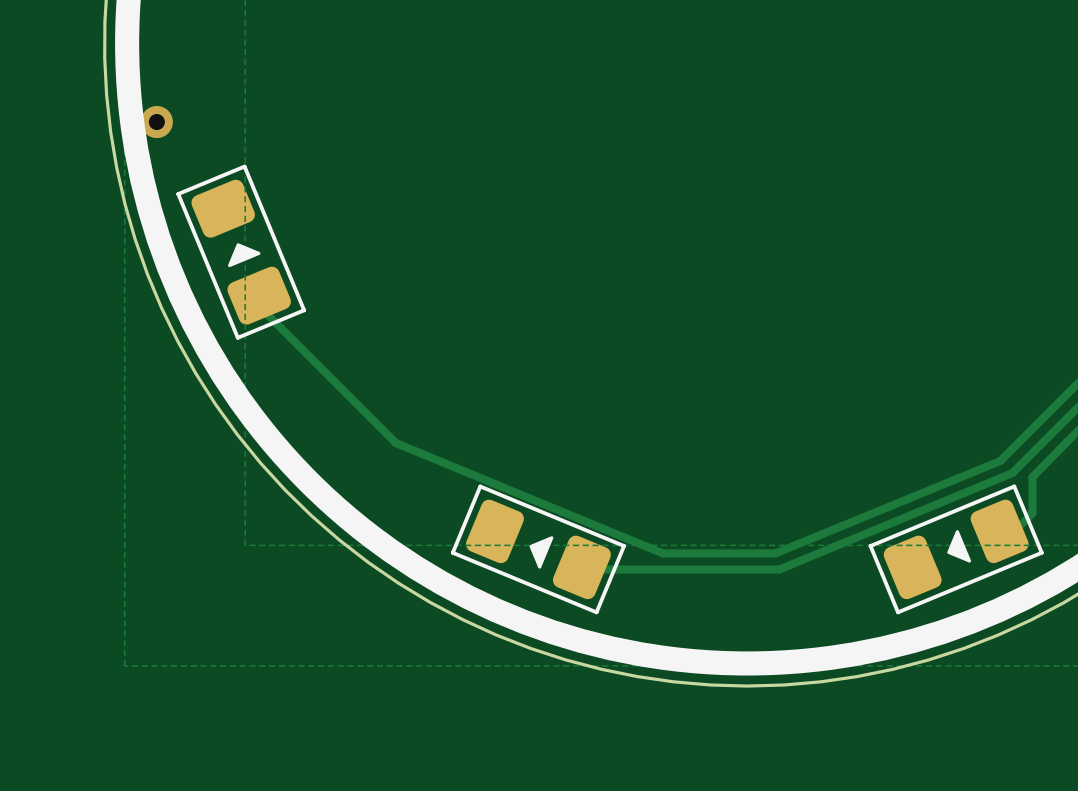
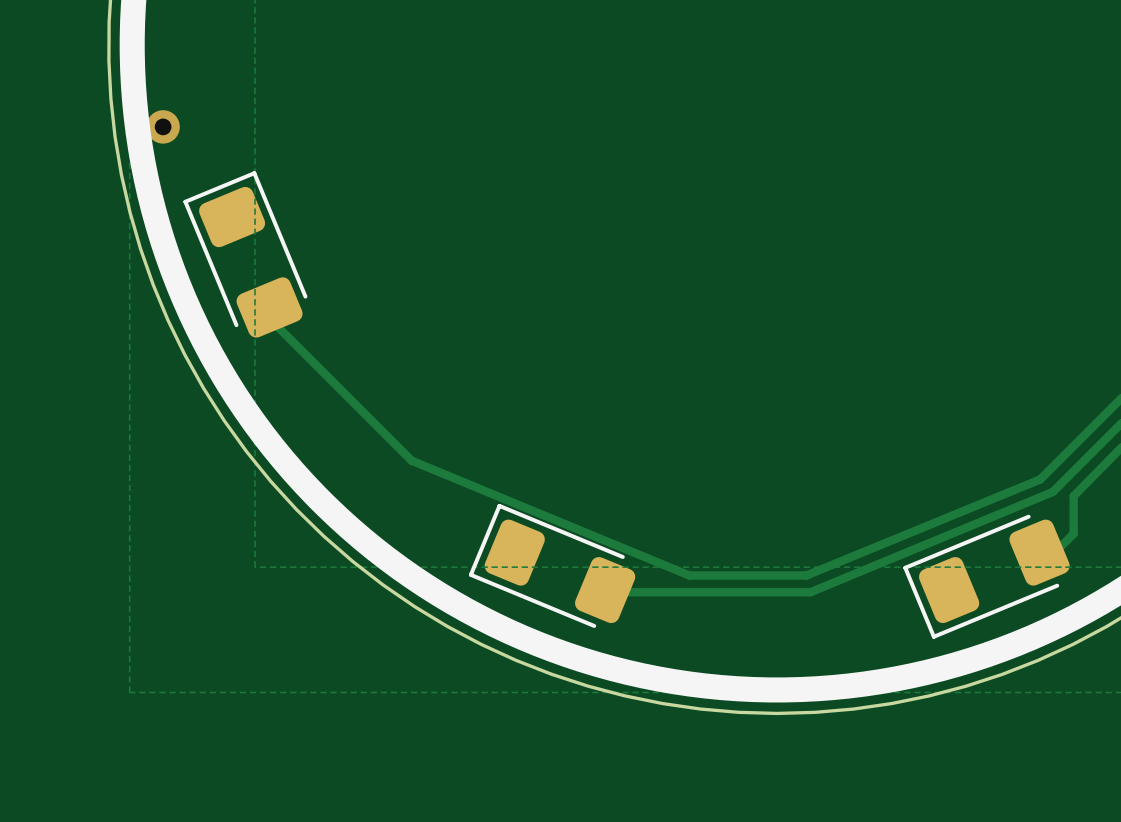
part footprint: [176, 164, 307, 340] -> [183, 171, 308, 338]
part footprint: [450, 484, 626, 615] -> [468, 503, 636, 628]
part footprint: [868, 484, 1044, 615] -> [903, 514, 1070, 639]

